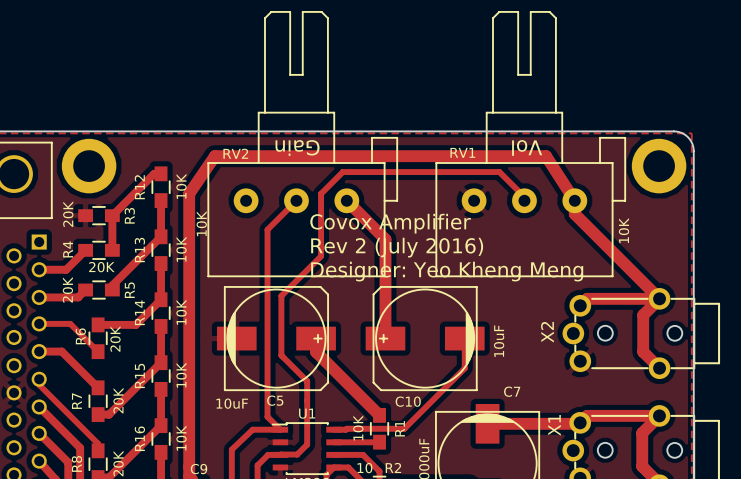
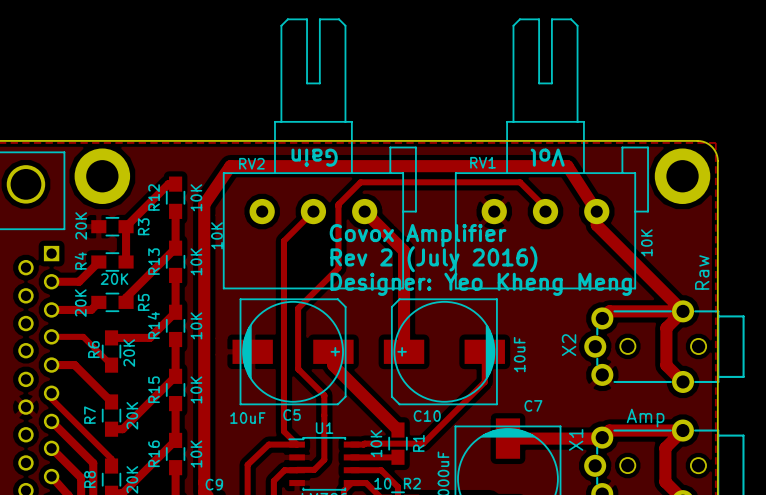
X2 value: none -> Raw (702, 272)
X1 value: none -> Amp (645, 418)

